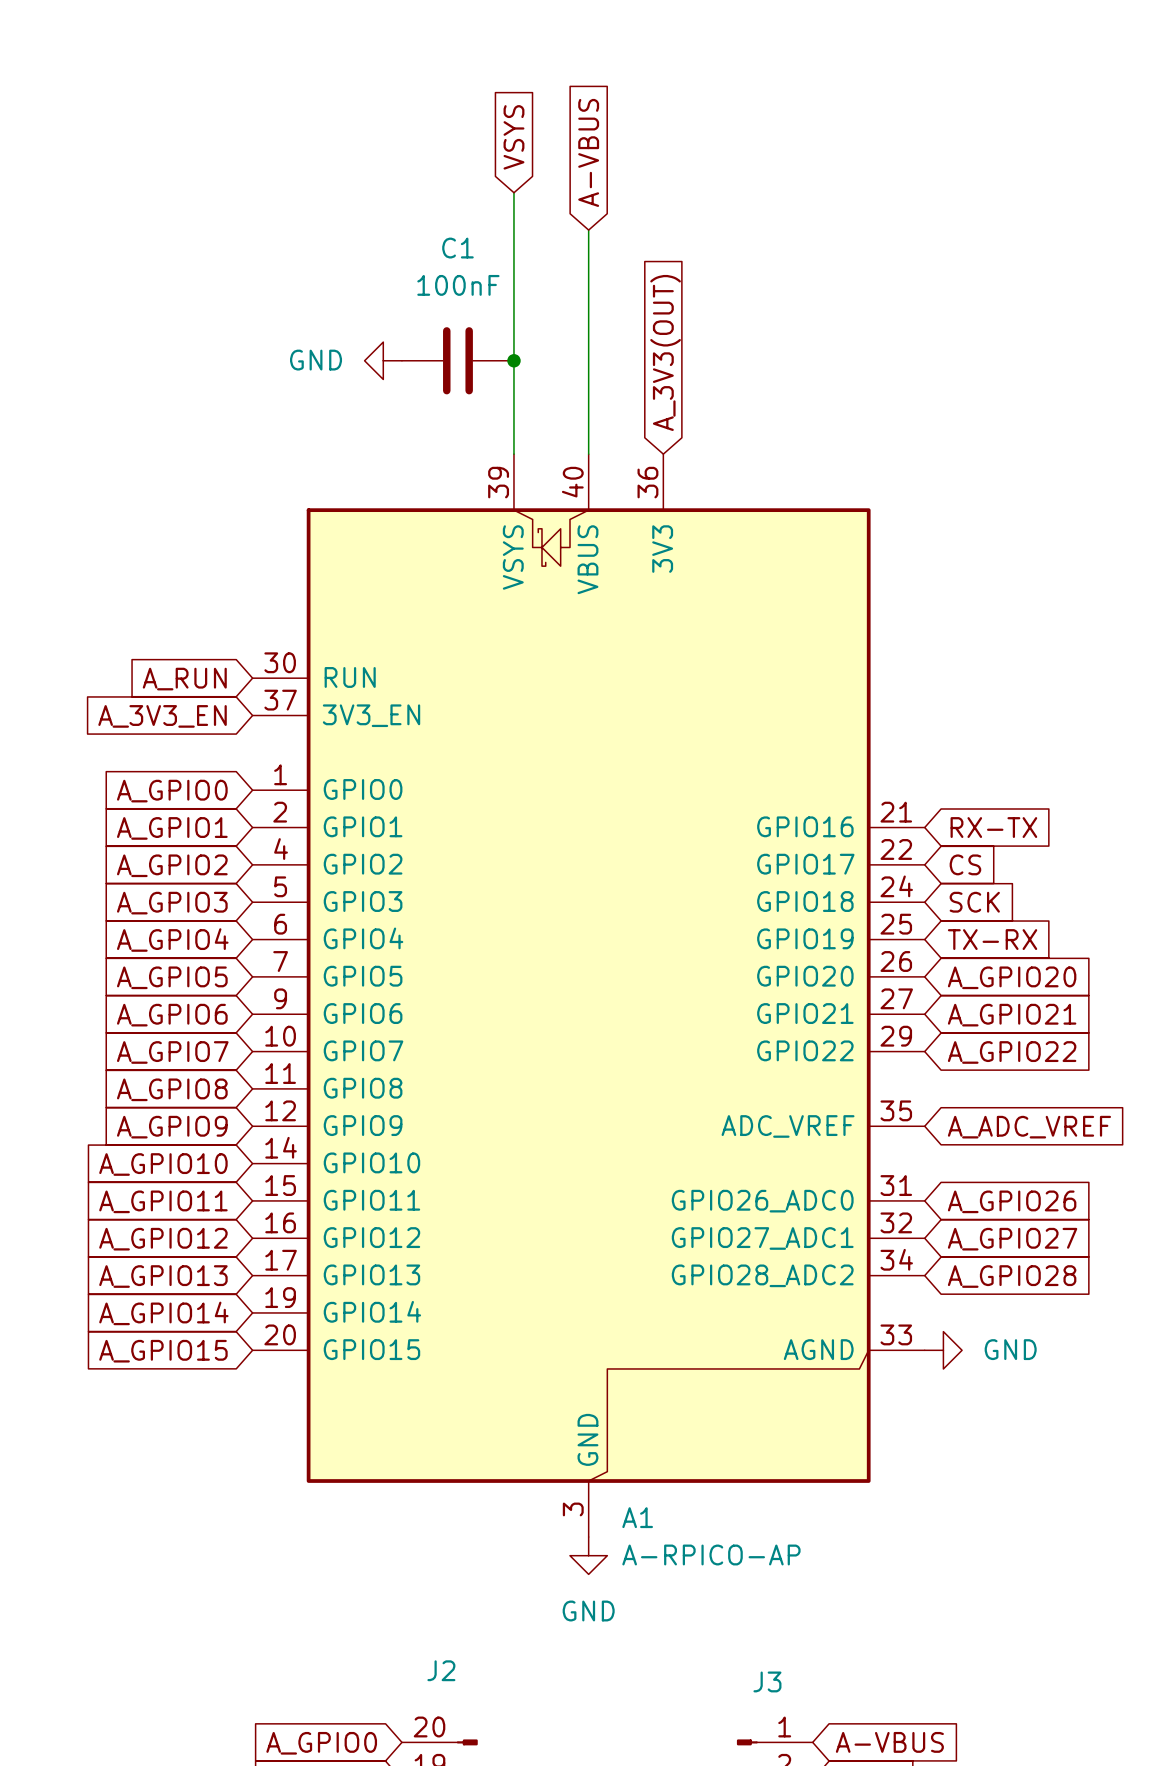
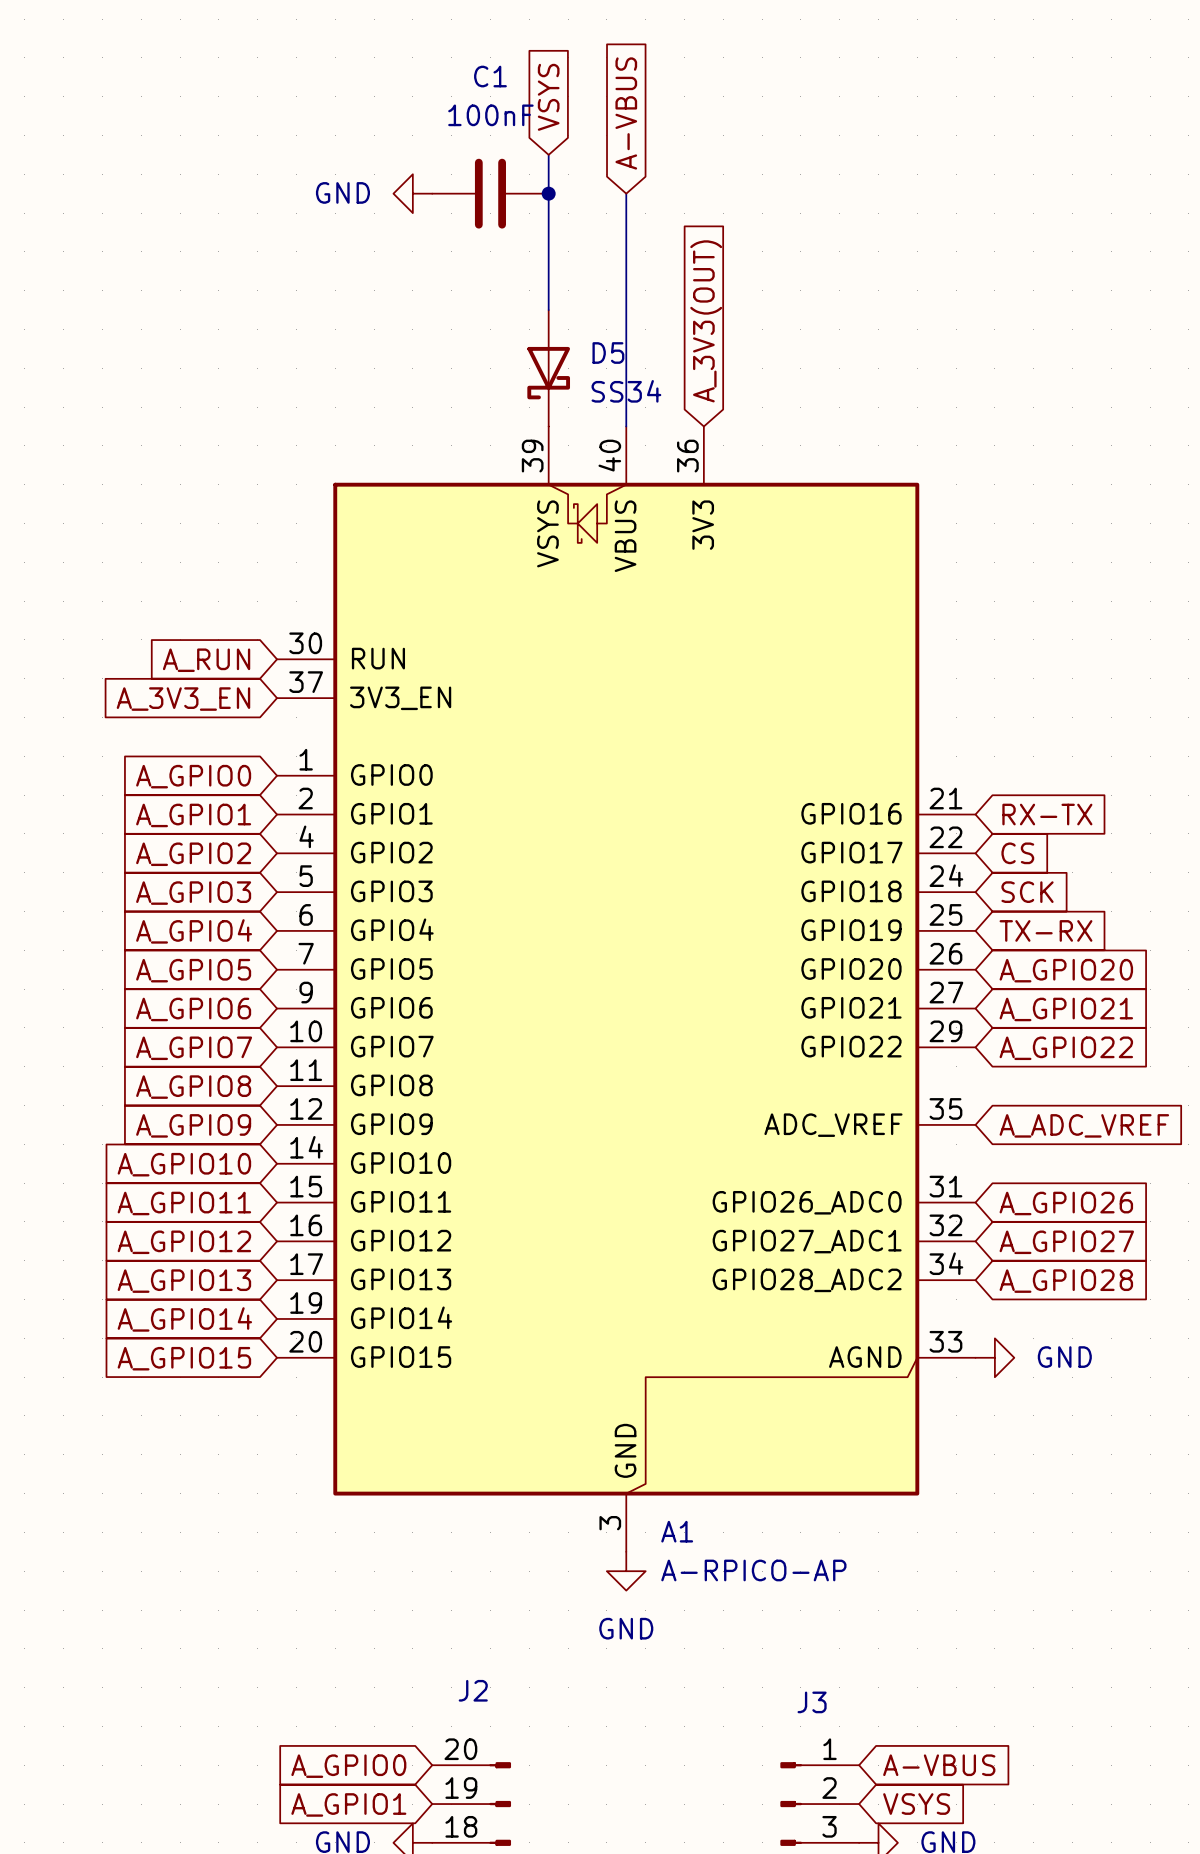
junction: none -> (548, 193)
power symbol position: GND (383, 360) -> GND (412, 193)
C1 position: (457, 360) -> (490, 193)
junction: (513, 360) -> none
D5: none -> SS34 (548, 368)

